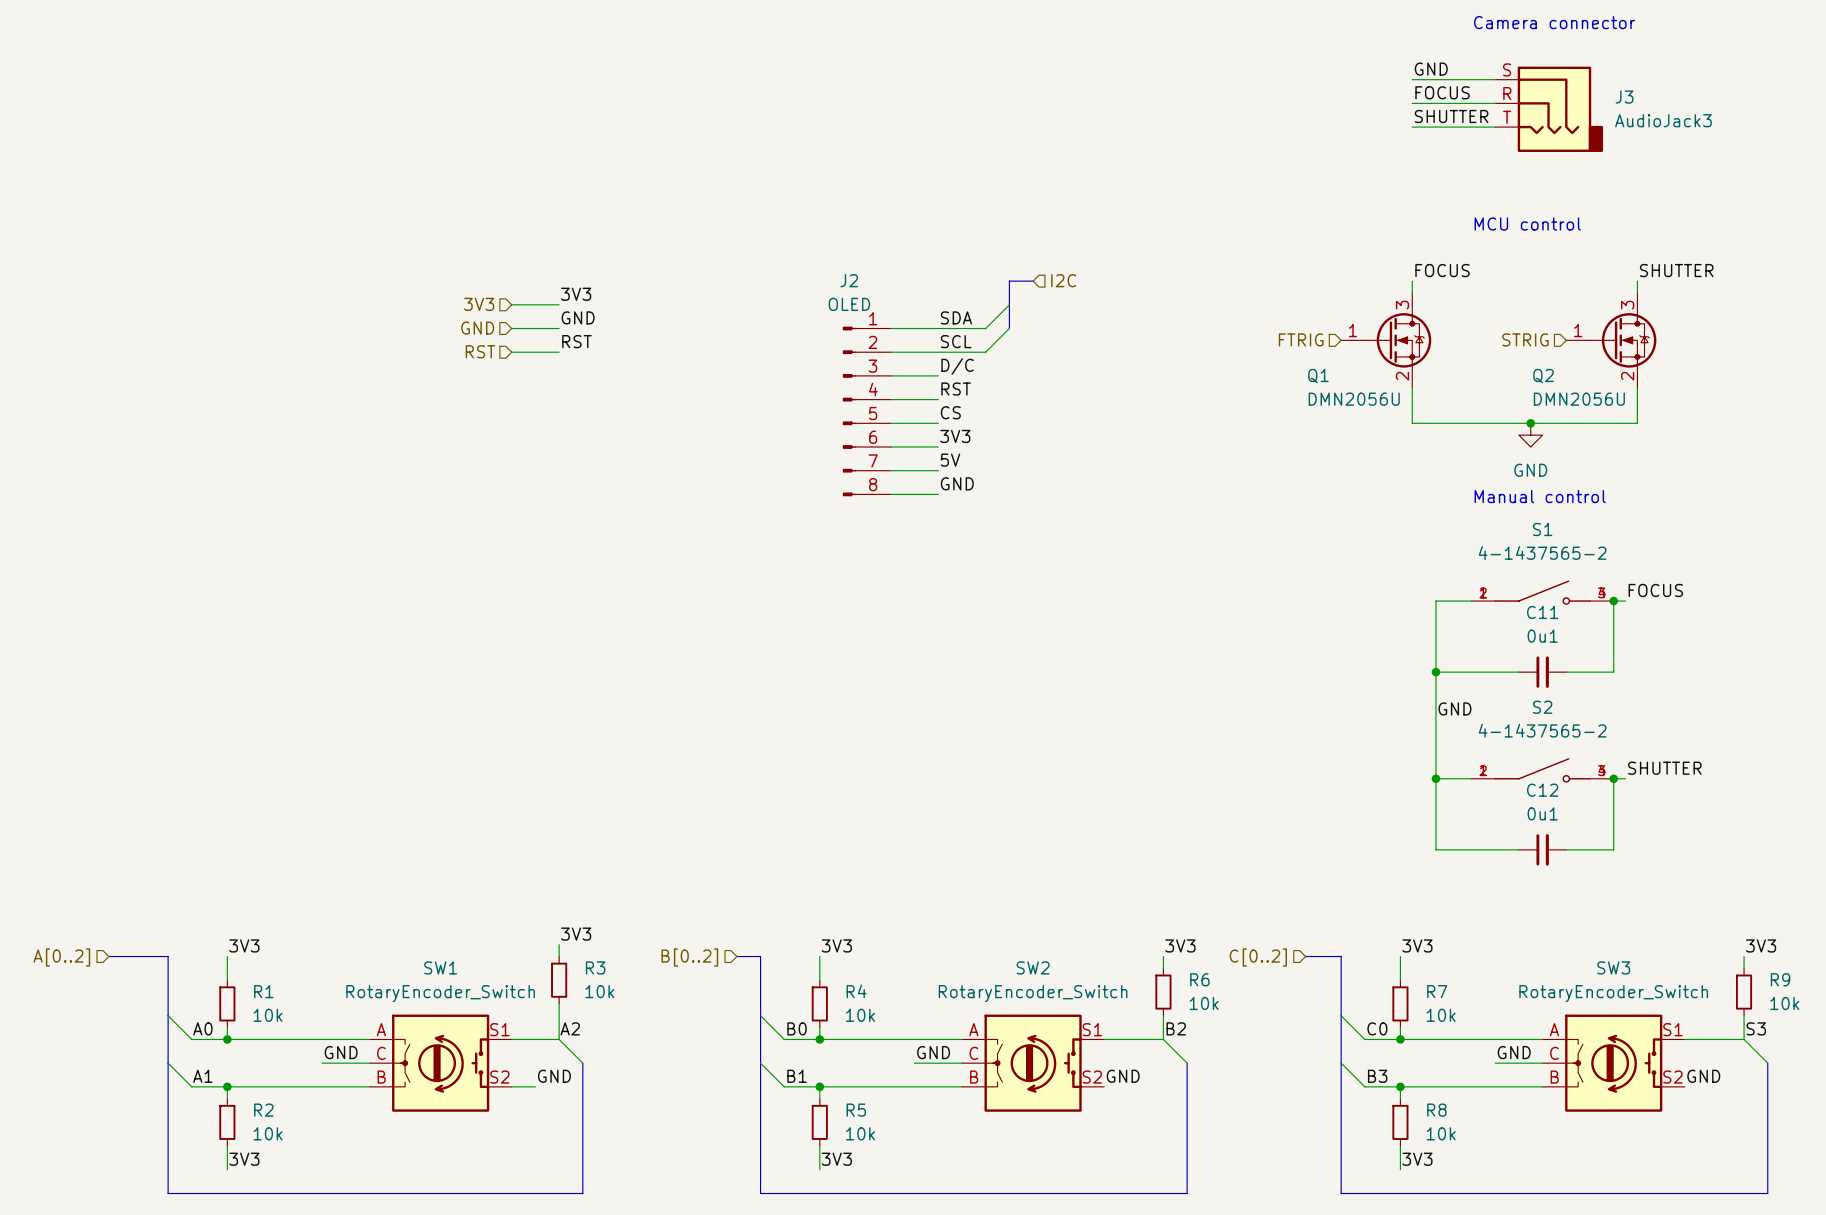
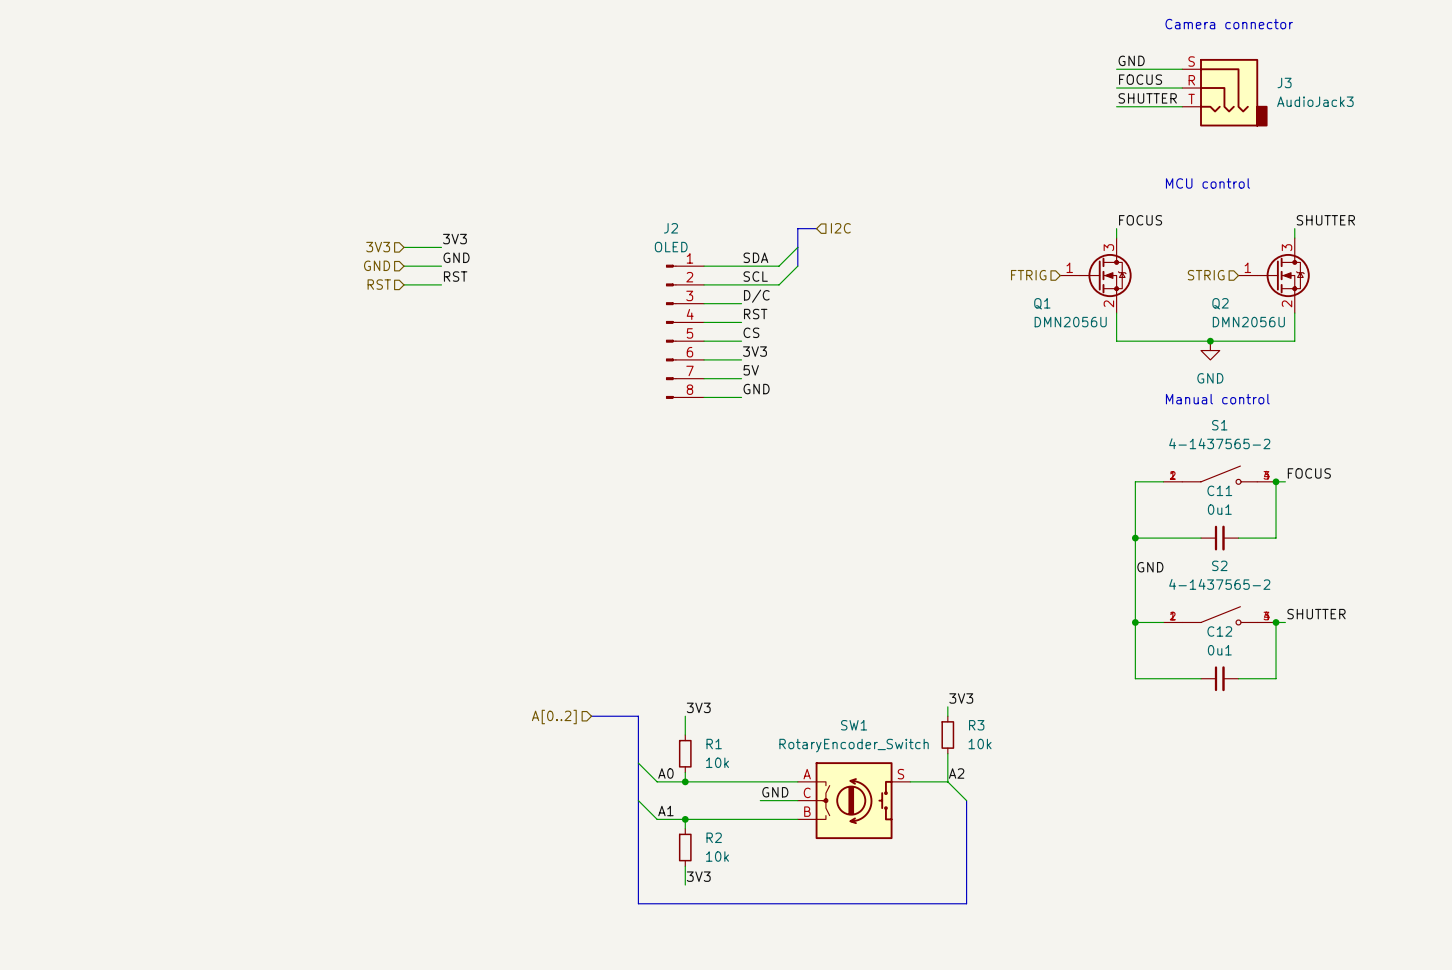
bus: none -> (591, 716) (638, 716) (638, 903) (966, 903) (966, 800)
hierarchical label: none -> A[0..2] (554, 717)
label: 3V3 (576, 934) -> none
wire: (559, 944) (559, 956) -> none
wire: none -> (947, 753) (947, 781)
label: 3V3 (244, 945) -> none
label position: 3V3 (836, 945) -> 3V3 (698, 707)
label position: 3V3 (1180, 945) -> 3V3 (961, 698)
label: 3V3 (1417, 945) -> none
label: 3V3 (1761, 945) -> none
bus: (108, 956) (168, 956) (168, 1193) (582, 1193) (582, 1063) -> none
wire: (227, 956) (227, 980) -> none
bus: (736, 956) (760, 956) (760, 1193) (1187, 1193) (1187, 1063) -> none
wire: (819, 956) (819, 980) -> (685, 716) (685, 734)
wire: (1163, 956) (1163, 968) -> (947, 706) (947, 716)
bus: (1305, 956) (1341, 956) (1341, 1193) (1767, 1193) (1767, 1063) -> none
wire: (1400, 956) (1400, 980) -> none
wire: (1744, 956) (1744, 968) -> none
hierarchical label: A[0..2] (61, 957) -> none
hierarchical label: B[0..2] (689, 957) -> none
hierarchical label: C[0..2] (1258, 957) -> none
label: none -> A0 (665, 773)
label: none -> A2 (956, 773)
R3 position: (559, 980) -> (947, 734)
junction: none -> (685, 781)
wire: none -> (910, 781) (947, 781)
R6: 10k (1163, 992) -> none
R9: 10k (1744, 992) -> none
R1 position: (227, 1003) -> (685, 753)
wire: (559, 1003) (559, 1039) -> none
R4: 10k (819, 1003) -> none
R7: 10k (1400, 1003) -> none
SW1 symbol: [369, 1014, 512, 1112] -> [797, 762, 911, 840]
wire: (168, 1015) (191, 1039) (369, 1039) -> none
wire: (760, 1015) (784, 1039) (962, 1039) -> (638, 763) (657, 781) (797, 781)
wire: (1163, 1015) (1163, 1039) -> none
wire: (1341, 1015) (1364, 1039) (1542, 1039) -> none
wire: (1744, 1015) (1744, 1039) -> none
label: none -> A1 (665, 811)
wire: (227, 1027) (227, 1039) -> none
wire: (819, 1027) (819, 1039) -> (685, 772) (685, 781)
junction: none -> (685, 819)
wire: (1400, 1027) (1400, 1039) -> none
label: A0 (202, 1028) -> none
label: A2 (570, 1028) -> none
label: B0 (797, 1028) -> none
label: B2 (1176, 1028) -> none
label: C0 (1377, 1028) -> none
label: S3 (1756, 1028) -> none
junction: (227, 1039) -> none
wire: (511, 1039) (559, 1039) -> none
wire: (559, 1039) (582, 1063) -> none
junction: (819, 1039) -> none
wire: (1104, 1039) (1163, 1039) -> none
wire: (1163, 1039) (1187, 1063) -> (947, 781) (966, 800)
junction: (1400, 1039) -> none
wire: (1684, 1039) (1744, 1039) -> none
wire: (1744, 1039) (1767, 1063) -> none
label: GND (341, 1052) -> none
label position: GND (933, 1052) -> GND (775, 792)
label: GND (1514, 1052) -> none
wire: (168, 1063) (191, 1086) (369, 1086) -> none
wire: (322, 1063) (369, 1063) -> none
wire: (760, 1063) (784, 1086) (962, 1086) -> (638, 800) (657, 819) (797, 819)
wire: (914, 1063) (962, 1063) -> (760, 800) (797, 800)
SW2: RotaryEncoder_Switch (1033, 1063) -> none
wire: (1341, 1063) (1364, 1086) (1542, 1086) -> none
wire: (1495, 1063) (1542, 1063) -> none
SW3: RotaryEncoder_Switch (1613, 1063) -> none
label: A1 (202, 1076) -> none
label: GND (554, 1076) -> none
label: B1 (797, 1076) -> none
label: GND (1123, 1076) -> none
label: B3 (1377, 1076) -> none
label: GND (1703, 1076) -> none
wire: (227, 1086) (227, 1098) -> none
junction: (227, 1086) -> none
wire: (511, 1086) (535, 1086) -> none
wire: (819, 1086) (819, 1098) -> (685, 819) (685, 828)
junction: (819, 1086) -> none
wire: (1400, 1086) (1400, 1098) -> none
junction: (1400, 1086) -> none
R2 position: (227, 1122) -> (685, 847)
R5: 10k (819, 1122) -> none
R8: 10k (1400, 1122) -> none
wire: (227, 1146) (227, 1169) -> none
wire: (819, 1146) (819, 1169) -> (685, 866) (685, 885)
wire: (1400, 1146) (1400, 1169) -> none
label: 3V3 (244, 1159) -> none
label position: 3V3 (836, 1159) -> 3V3 (698, 876)
label: 3V3 (1417, 1159) -> none

